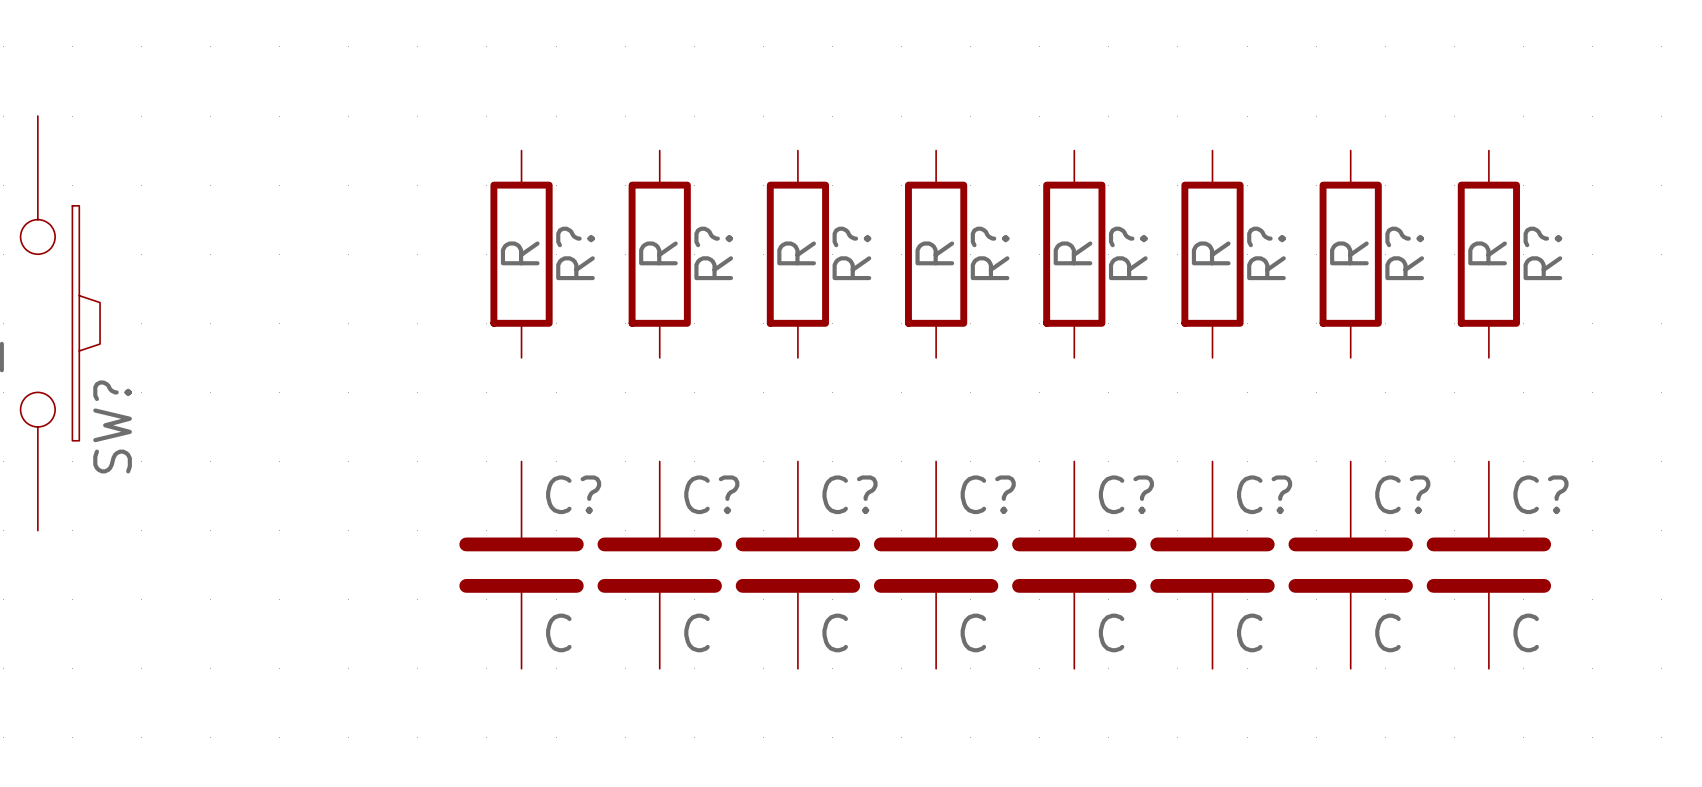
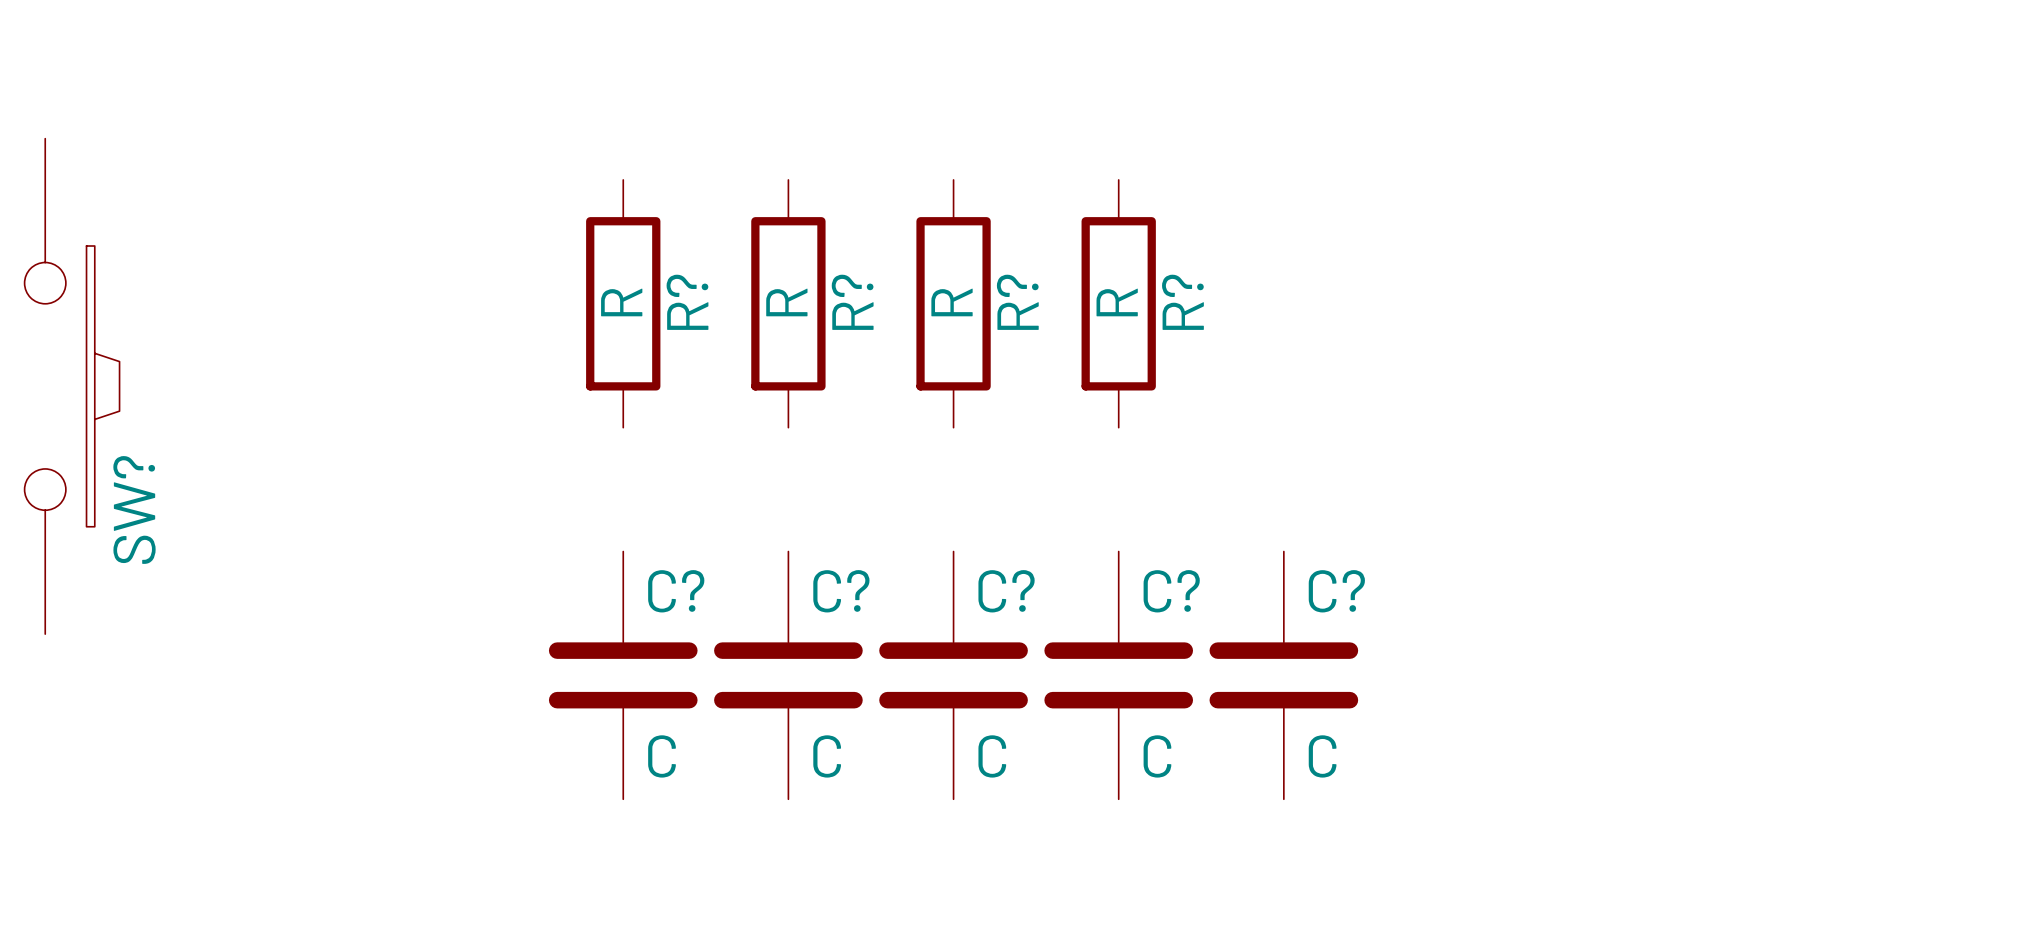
R?: R (1074, 254) -> none
R?: R (1212, 254) -> none
R?: R (1350, 254) -> none
R?: R (1488, 254) -> none
C?: C (1212, 565) -> none
C?: C (1350, 565) -> none
C?: C (1488, 565) -> none

